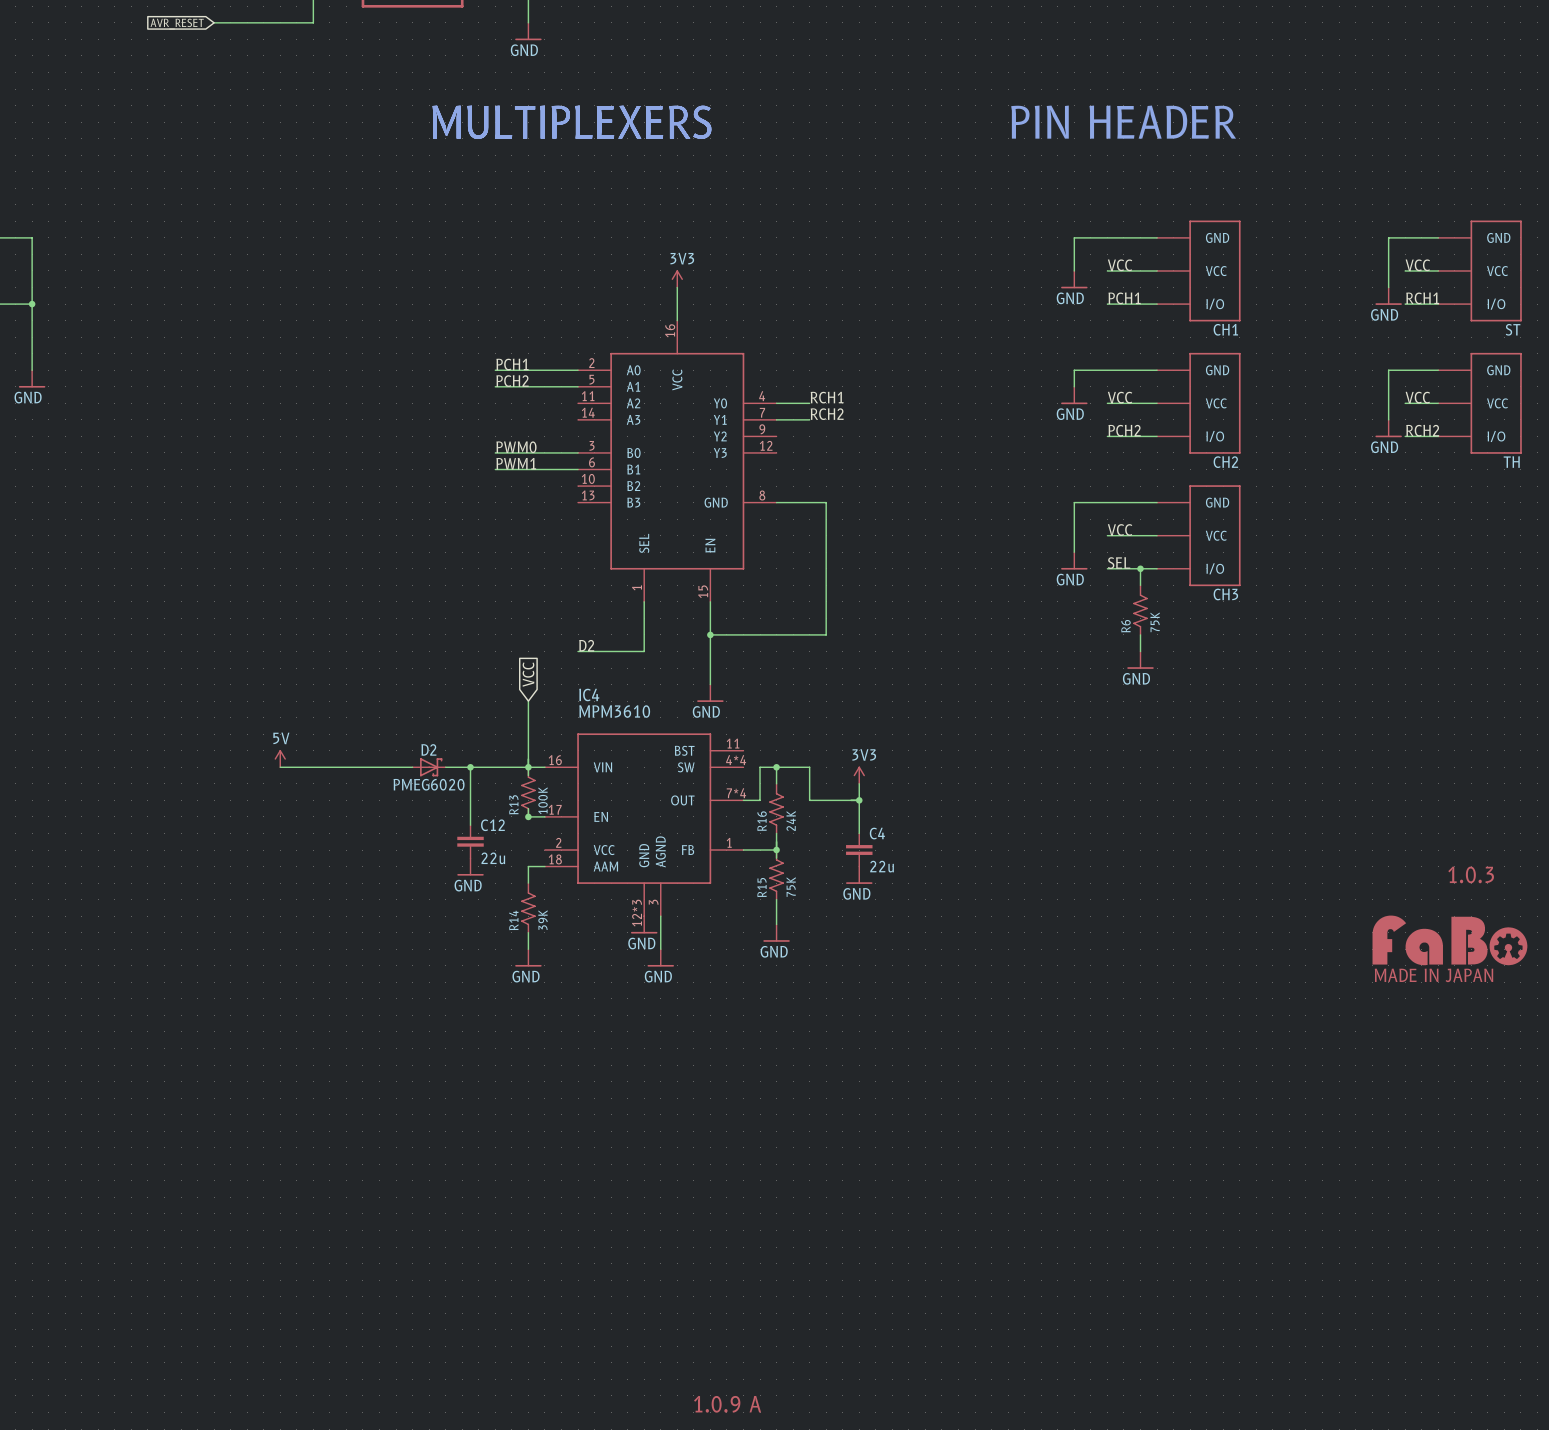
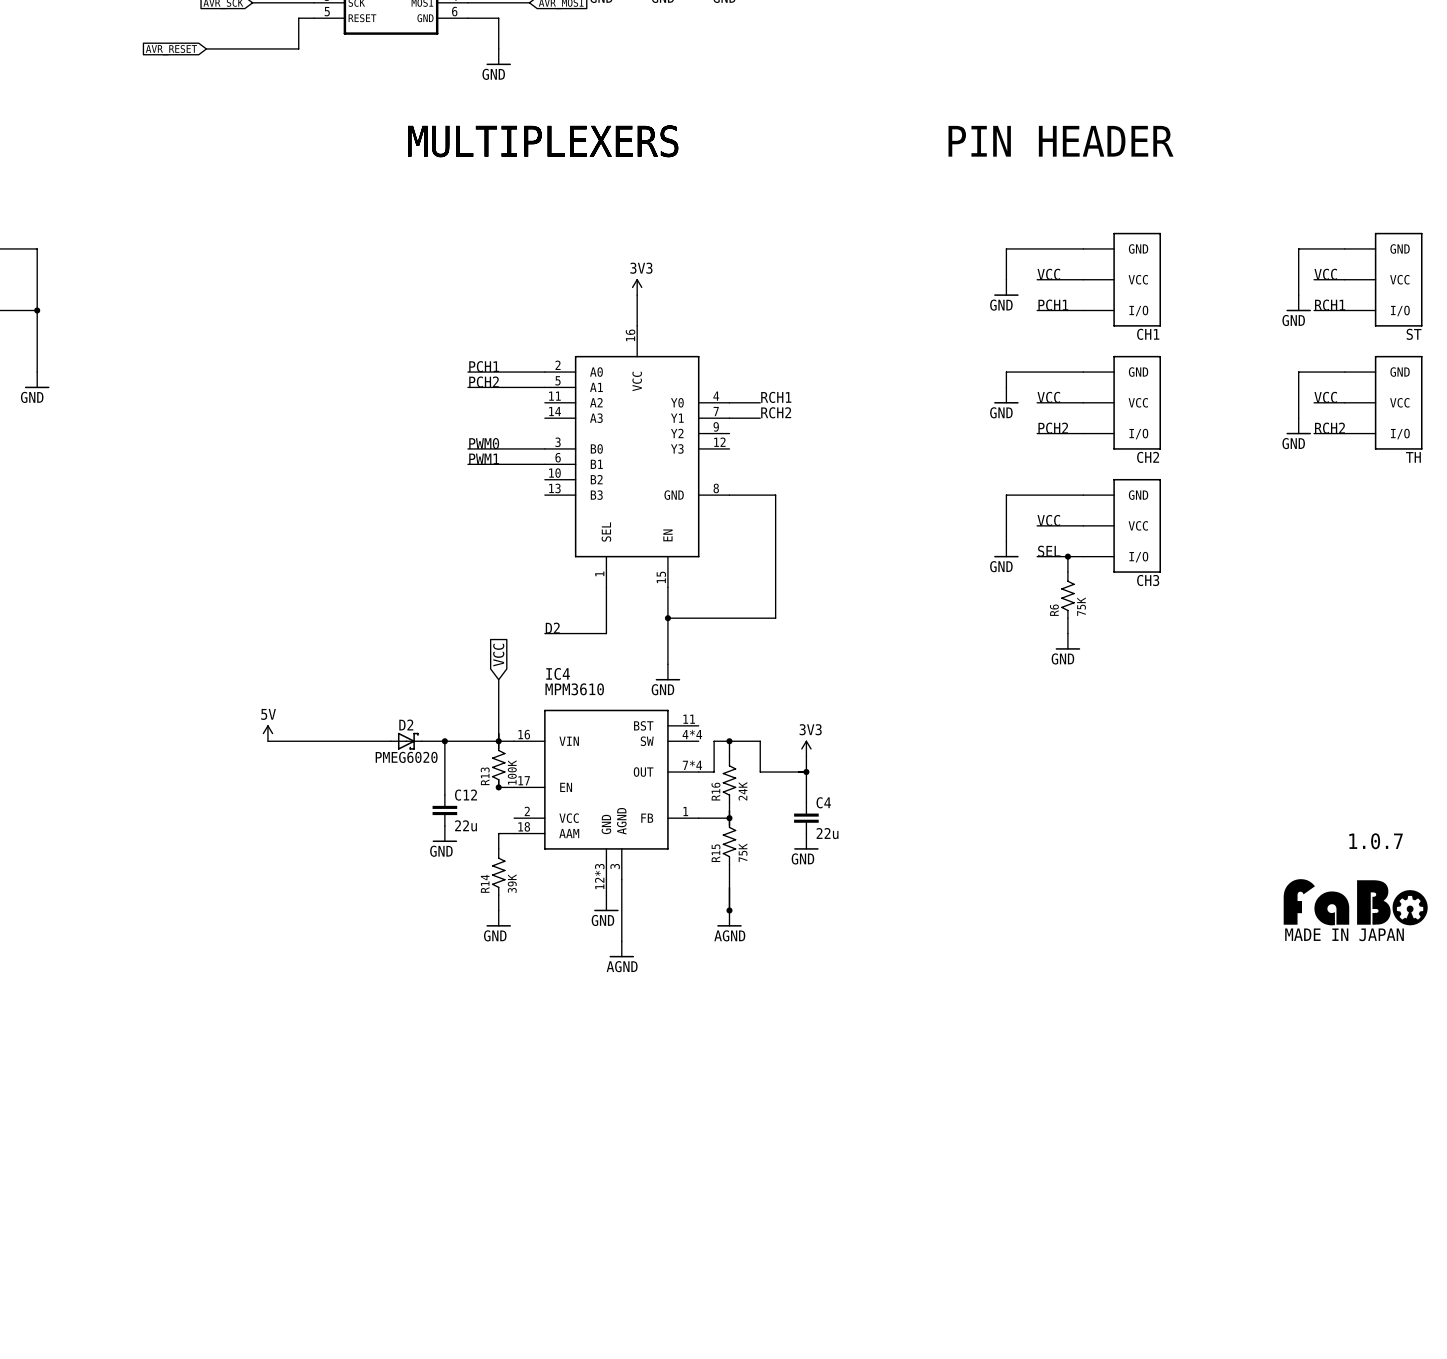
text: 1.0.3 (1471, 874) -> 1.0.7 (1376, 841)
power symbol: GND (644, 924) -> none
power symbol: GND (776, 933) -> none
power symbol: none -> GND (606, 903)
junction: none -> (729, 910)
power symbol: GND (660, 957) -> none
power symbol: none -> AGND (729, 918)
power symbol: none -> AGND (621, 949)
text: 1.0.9 A (727, 1404) -> none

